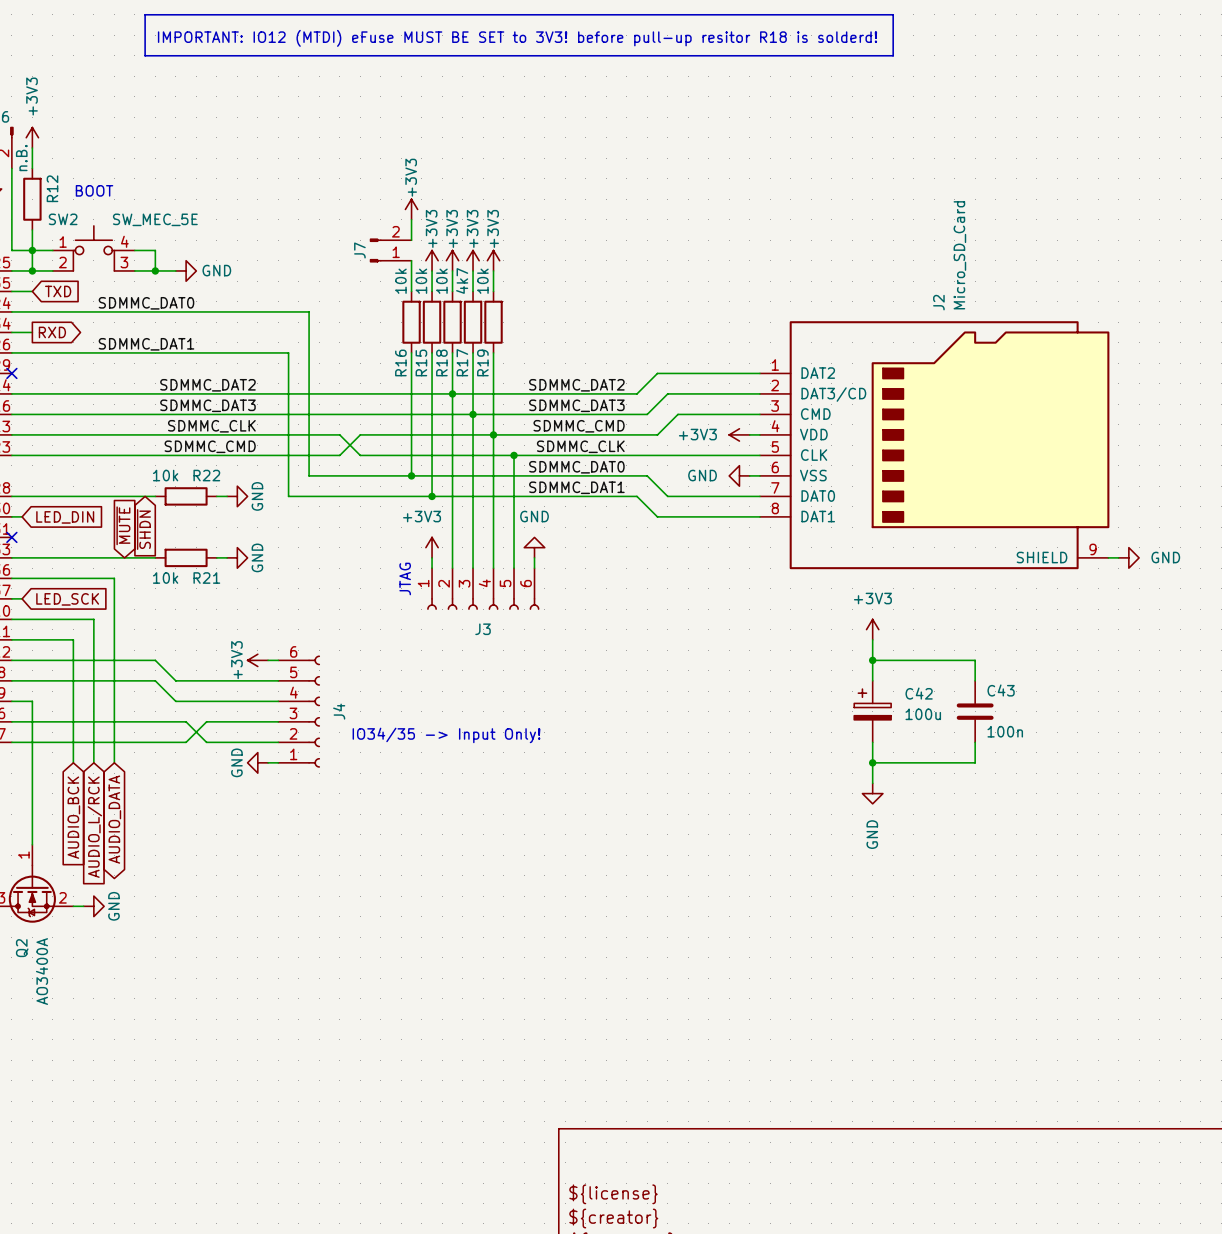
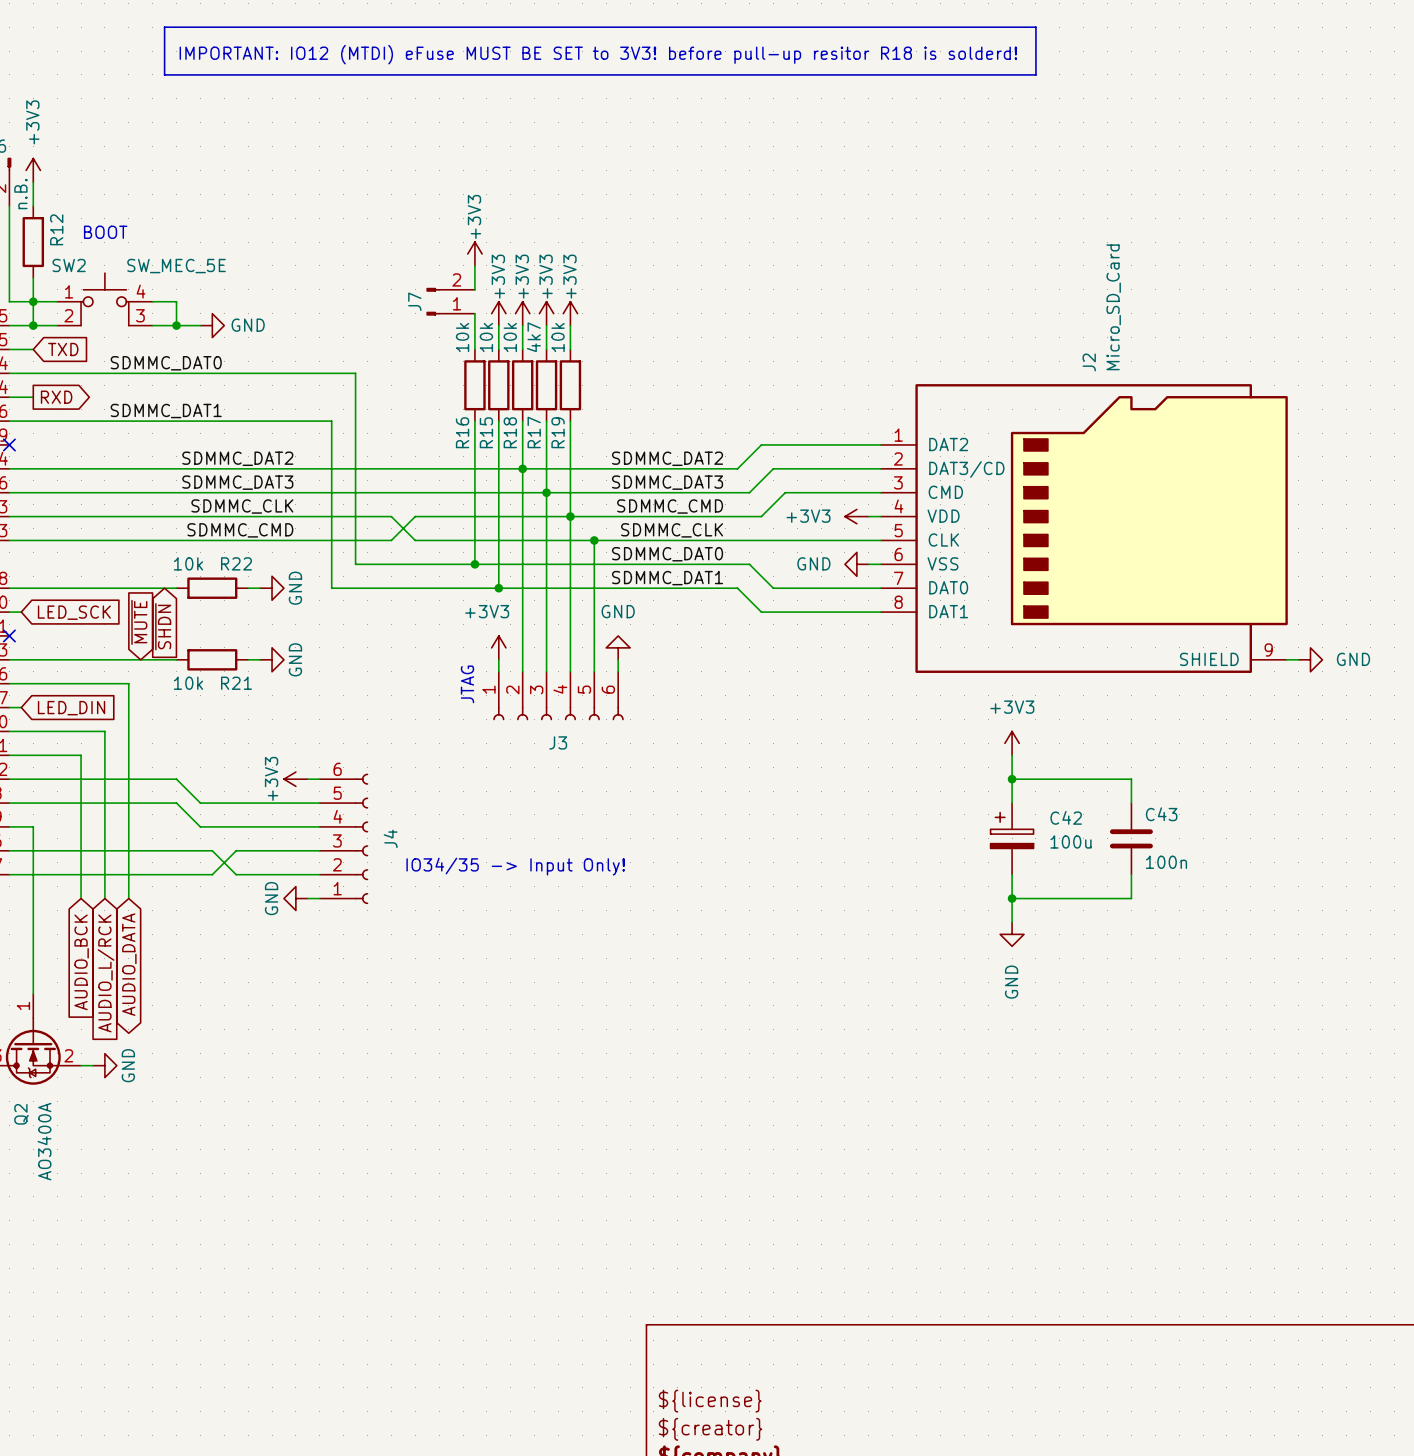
global label: LED_DIN (65, 517) -> LED_SCK (74, 612)
global label: LED_SCK (67, 599) -> LED_DIN (71, 708)

